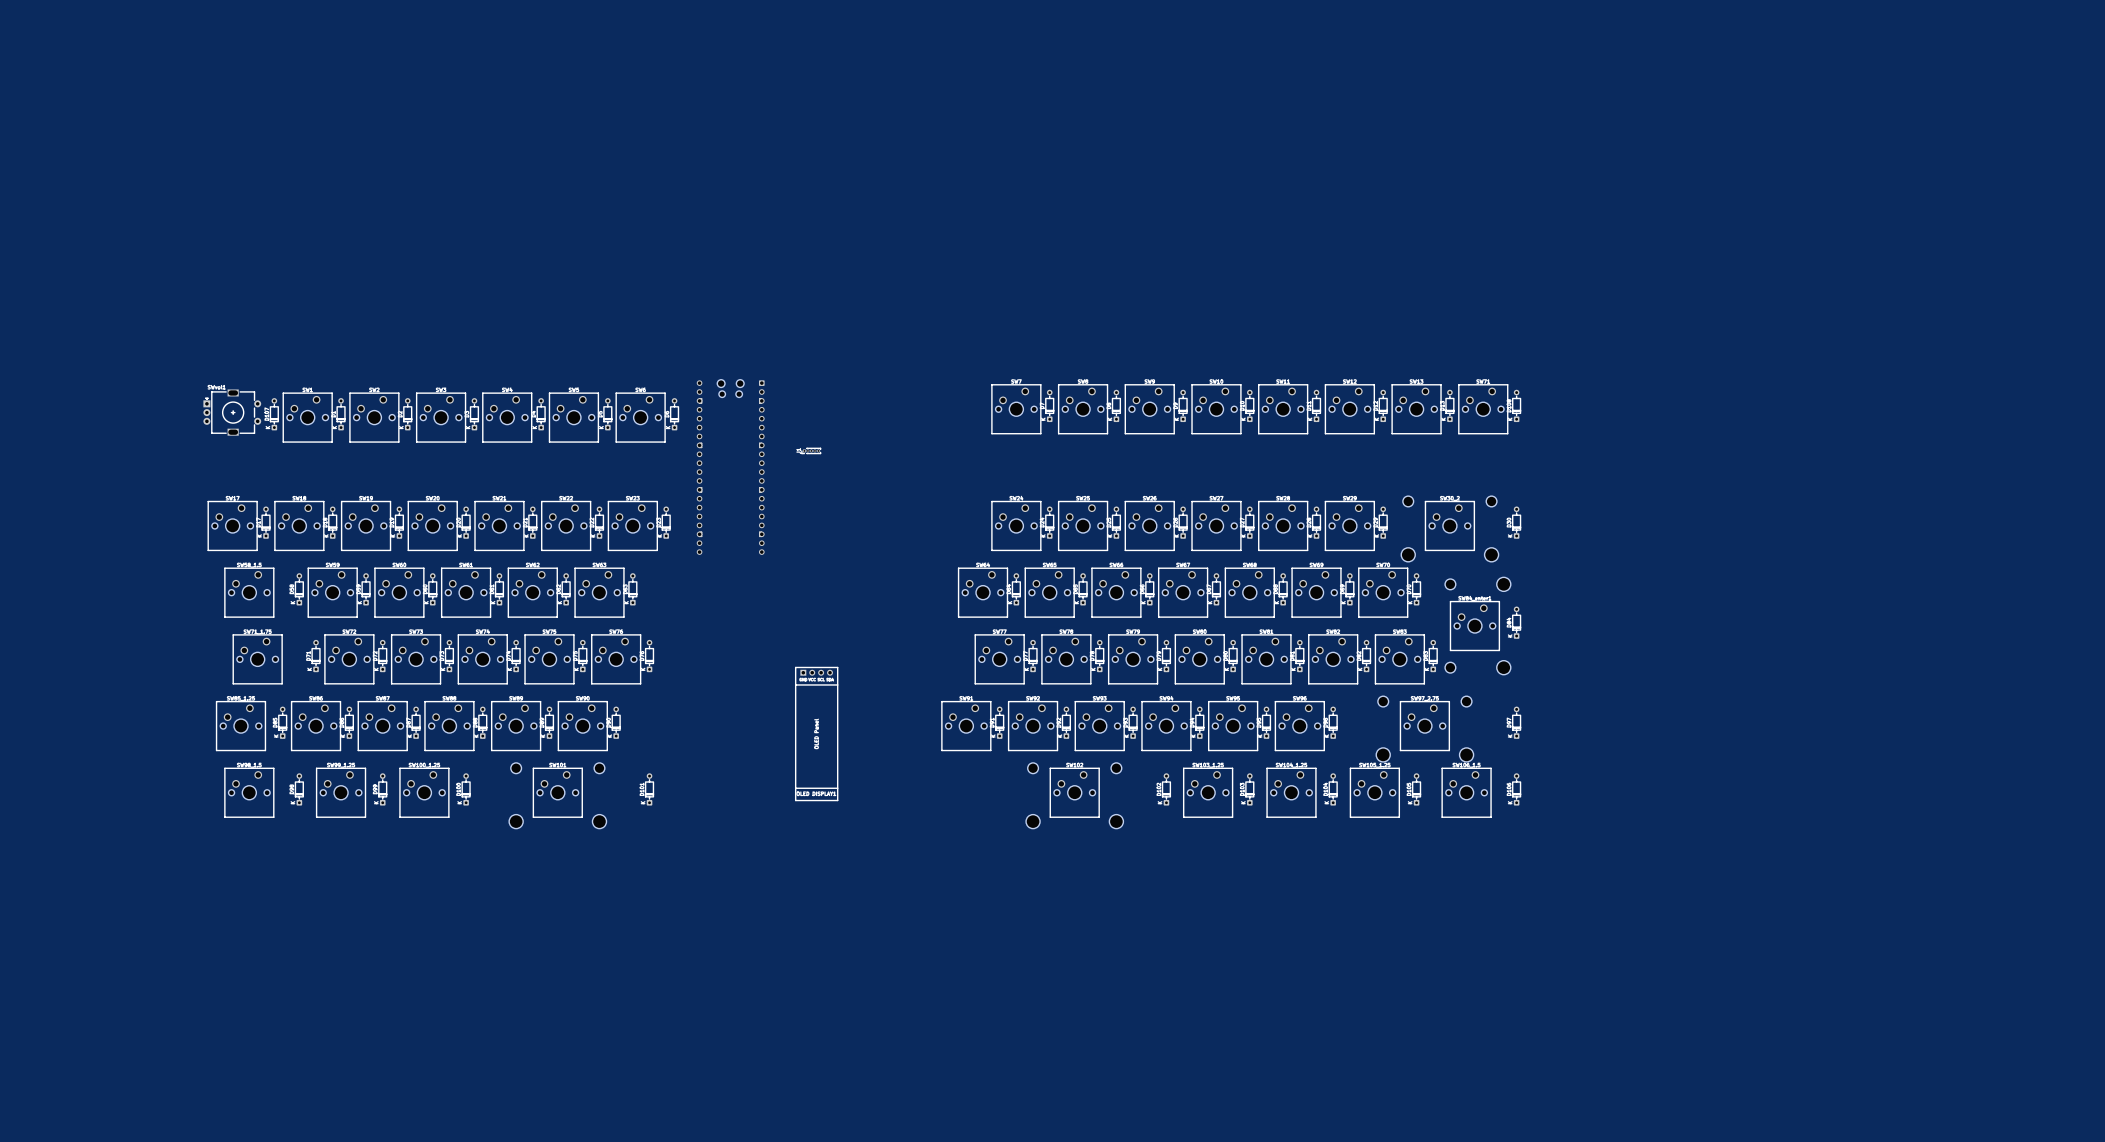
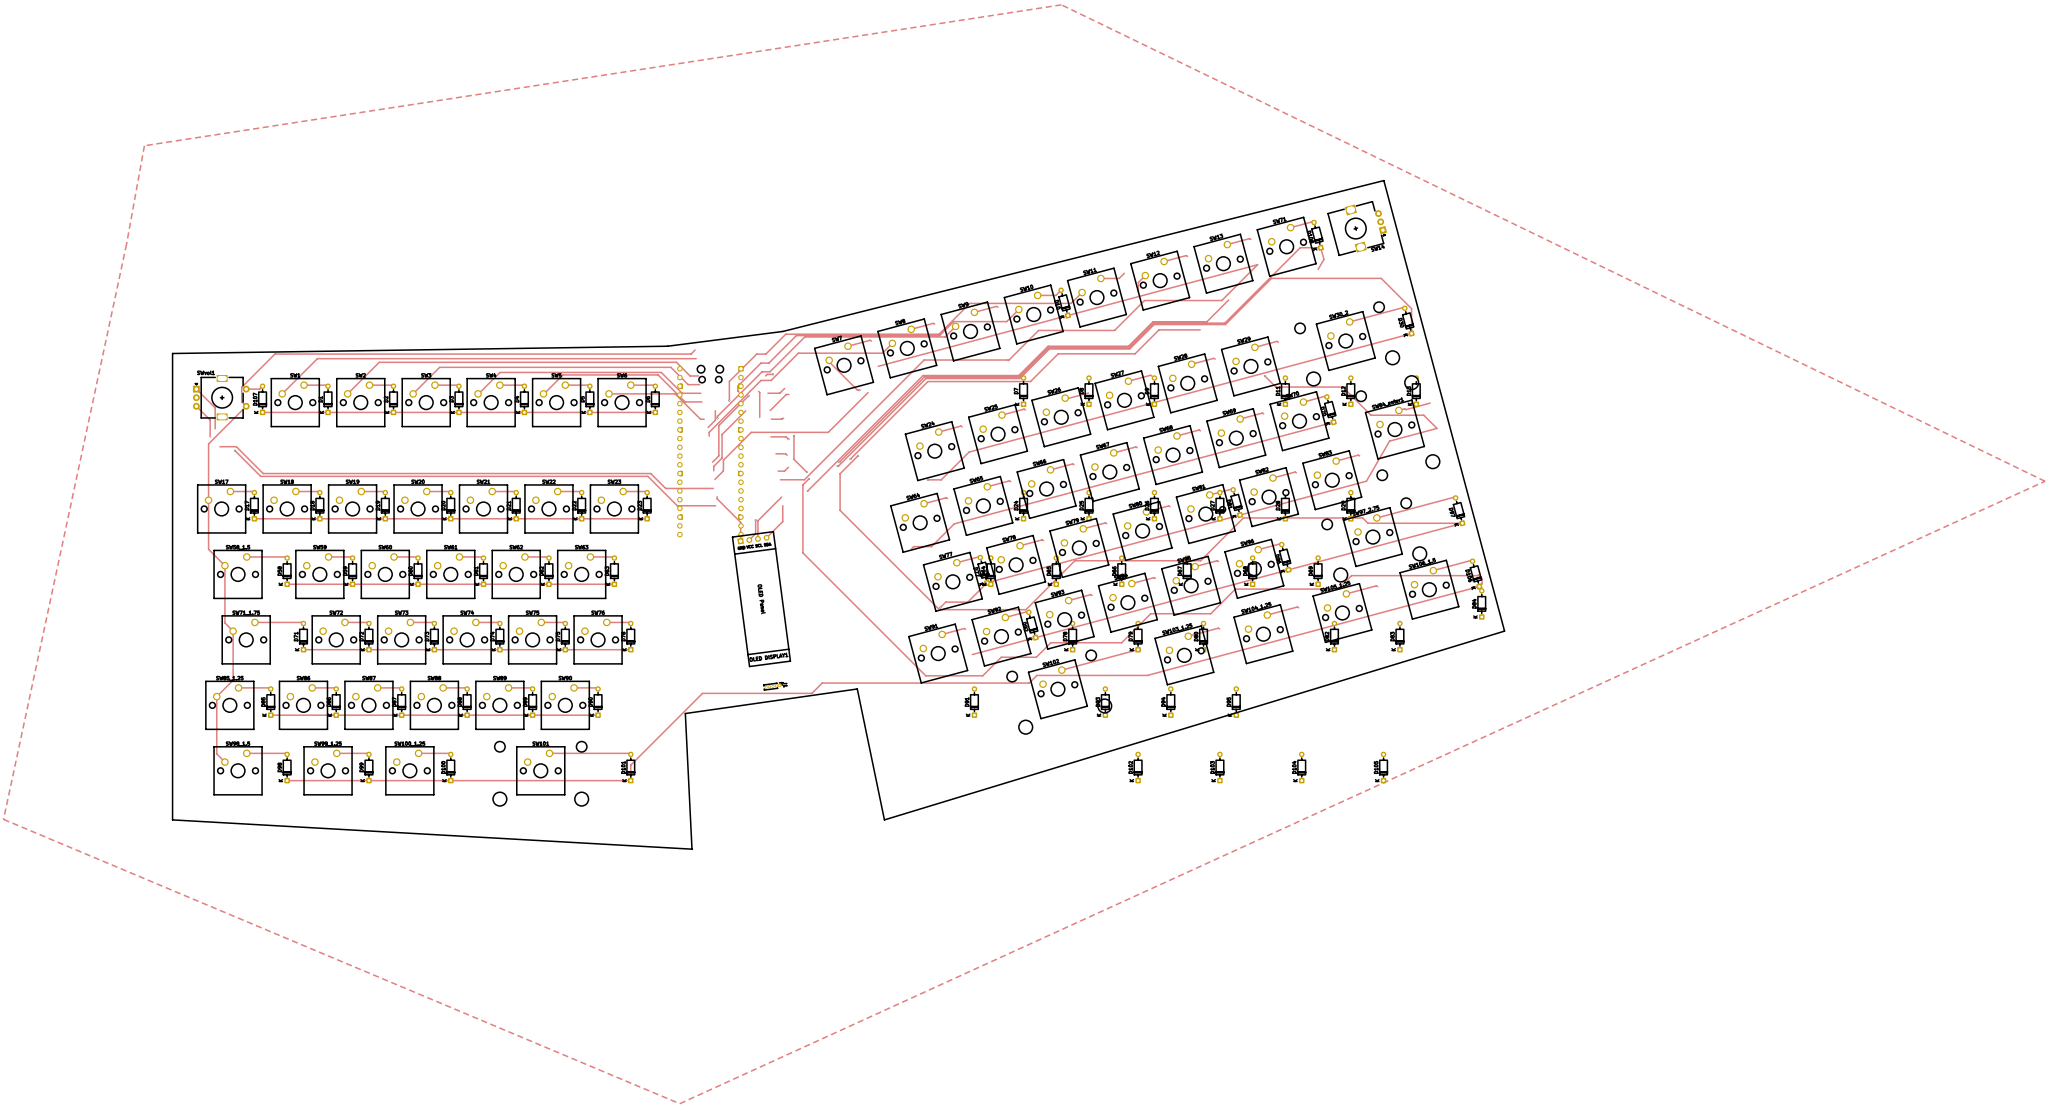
zone outline: none -> (1061, 4) (2045, 481) (679, 1103) (3, 819) (126, 244) (144, 145) (1061, 4)
board edge: none -> (1383, 180) (782, 331) (667, 346) (172, 353) (172, 819) (691, 849) (685, 713) (857, 688) (884, 819) (1504, 631) (1383, 180)
track: none -> (1314, 222) (1290, 227)
part: none -> (1357, 228)
track: none -> (1250, 239) (1227, 244)
track: none -> (1187, 256) (1164, 261)
track: none -> (1318, 269) (1323, 259) (1320, 247) (1300, 247) (1224, 323) (1153, 323) (1129, 347) (1048, 347) (1019, 376) (924, 376) (839, 462)
track: none -> (1124, 273) (1119, 278) (1100, 278)
track: none -> (1145, 275) (1138, 282) (1138, 292)
track: none -> (1061, 290) (1055, 295) (1037, 295)
track: none -> (1082, 292) (1071, 303) (969, 303) (939, 334) (785, 334) (765, 354) (756, 354) (729, 381) (729, 400)
track: none -> (1228, 299) (1206, 321) (1153, 321) (1128, 346) (1048, 346) (1018, 375) (923, 375) (807, 491)
track: none -> (997, 307) (974, 312)
track: none -> (1404, 308) (1349, 321)
track: none -> (1018, 309) (1006, 321) (953, 321) (939, 335) (796, 335) (768, 363) (760, 363) (737, 386) (738, 391)
track: none -> (934, 324) (911, 329)
track: none -> (955, 326) (945, 336) (804, 336) (769, 371) (762, 371) (717, 418)
track: none -> (1200, 329) (1159, 329) (1135, 353) (1058, 353) (1030, 381) (927, 381) (850, 459)
track: none -> (871, 341) (847, 346)
track: none -> (1278, 342) (1254, 347)
track: none -> (892, 343) (882, 353) (798, 353) (771, 380) (761, 380) (709, 432) (709, 436)
track: none -> (695, 350) (691, 354) (274, 354) (241, 387) (241, 401) (246, 406) (208, 443) (208, 549) (224, 565) (224, 622) (233, 631) (233, 680) (216, 696) (216, 753) (224, 762)
track: none -> (696, 358) (317, 358) (282, 393)
track: none -> (1215, 359) (1191, 364)
track: none -> (829, 360) (859, 390)
track: none -> (878, 366) (1257, 264) (1221, 300) (1144, 300) (1114, 330) (1038, 330) (1008, 360) (924, 360) (804, 479) (780, 479)
track: none -> (773, 374) (765, 375)
via: none -> (773, 374)
part footprint: [1245, 389, 1254, 423] -> [1058, 287, 1072, 319]
part footprint: [1512, 389, 1521, 423] -> [1311, 219, 1324, 251]
track: none -> (698, 375) (690, 375) (676, 362) (379, 362) (347, 393)
track: none -> (1151, 376) (1128, 381)
track: none -> (1264, 376) (1275, 387) (1342, 387) (1370, 415) (1423, 415) (1436, 428) (1389, 441) (1366, 481) (987, 582) (967, 602) (945, 602) (940, 607)
via: none -> (1264, 376)
track: none -> (304, 385) (328, 386)
track: none -> (369, 385) (393, 386)
track: none -> (434, 385) (458, 386)
track: none -> (499, 385) (524, 386)
track: none -> (565, 385) (589, 386)
track: none -> (630, 385) (655, 386)
track: none -> (699, 384) (688, 384) (670, 367) (439, 367) (413, 393)
track: none -> (262, 386) (259, 389) (246, 389)
track: none -> (196, 389) (215, 407) (215, 428)
track: none -> (784, 388) (779, 393) (767, 393)
via: none -> (859, 390)
track: none -> (758, 391) (759, 417)
track: none -> (868, 392) (828, 432) (751, 432) (723, 460) (723, 470) (714, 479)
track: none -> (1088, 392) (1065, 398)
track: none -> (544, 393) (563, 374) (658, 374) (685, 401) (701, 401)
track: none -> (609, 393) (675, 393) (700, 419) (704, 419)
track: none -> (700, 393) (682, 393) (661, 372) (500, 372) (478, 393)
track: none -> (788, 394) (786, 394) (770, 410)
part rotation: 0° (1016, 409) -> 15° counterclockwise (844, 365)
part position: (1016, 409) -> (844, 365)
part rotation: 0° (1083, 409) -> 15° counterclockwise (907, 348)
part position: (1083, 409) -> (907, 348)
part rotation: 0° (1149, 409) -> 15° counterclockwise (970, 331)
part position: (1149, 409) -> (970, 331)
part rotation: 0° (1216, 409) -> 15° counterclockwise (1033, 314)
part position: (1216, 409) -> (1033, 314)
part rotation: 0° (1283, 409) -> 15° counterclockwise (1096, 297)
part position: (1283, 409) -> (1096, 297)
part rotation: 0° (1349, 409) -> 15° counterclockwise (1160, 280)
part position: (1349, 409) -> (1160, 280)
part rotation: 0° (1416, 409) -> 15° counterclockwise (1223, 263)
part position: (1416, 409) -> (1223, 263)
part rotation: 0° (1483, 409) -> 15° counterclockwise (1286, 246)
part position: (1483, 409) -> (1286, 246)
track: none -> (748, 395) (718, 425) (718, 455) (712, 462)
via: none -> (748, 395)
track: none -> (1326, 396) (1303, 402)
via: none -> (729, 400)
track: none -> (1430, 403) (1398, 410)
track: none -> (196, 406) (210, 420) (210, 436)
track: none -> (715, 410) (715, 420) (708, 427)
track: none -> (745, 410) (722, 434) (722, 458) (713, 466) (713, 470)
track: none -> (1025, 409) (1001, 415)
track: none -> (262, 412) (655, 412)
track: none -> (1263, 413) (1240, 419)
via: none -> (717, 418)
track: none -> (783, 418) (771, 419)
track: none -> (1333, 422) (954, 523) (931, 546) (913, 546) (911, 548)
track: none -> (962, 426) (938, 432)
track: none -> (1200, 430) (1176, 435)
part rotation: 0° (811, 450) -> 172.5° clockwise (772, 686)
part position: (811, 450) -> (772, 686)
track: none -> (793, 435) (793, 459) (806, 472)
via: none -> (793, 435)
track: none -> (770, 436) (786, 436) (788, 439)
via: none -> (788, 439)
track: none -> (219, 446) (236, 446) (263, 473) (650, 473) (665, 488) (713, 488)
track: none -> (1137, 447) (1113, 452)
track: none -> (234, 450) (260, 476) (647, 476) (677, 505) (715, 505)
via: none -> (234, 450)
track: none -> (775, 453) (787, 455)
track: none -> (858, 455) (840, 473) (840, 510) (939, 609) (1025, 609) (1074, 560) (1200, 560) (1243, 517) (1362, 517) (1368, 523) (1462, 523) (972, 654)
via: none -> (858, 455)
track: none -> (1359, 455) (1336, 461)
via: none -> (850, 459)
via: none -> (839, 462)
track: none -> (1073, 464) (1050, 469)
track: none -> (837, 466) (925, 378) (1019, 378) (1049, 348) (1129, 348) (1154, 324) (1225, 324) (1271, 278) (1381, 278) (1411, 308) (1411, 333) (968, 452) (941, 479) (927, 479)
via: none -> (837, 466)
track: none -> (788, 467) (784, 471) (778, 471)
via: none -> (806, 472)
track: none -> (1296, 472) (1272, 478)
track: none -> (808, 478) (802, 484) (802, 552) (925, 675) (982, 675) (1001, 657) (1036, 657) (1050, 642) (1121, 642) (1150, 613) (1210, 613) (1235, 589) (1338, 589) (1351, 575) (1478, 575) (1482, 578) (1482, 583) (1479, 586) (1147, 675) (1036, 675) (1029, 683) (822, 683) (811, 693) (702, 693) (630, 765) (630, 780) (287, 780)
via: none -> (808, 478)
via: none -> (927, 479)
track: none -> (1010, 481) (987, 486)
track: none -> (1233, 489) (1209, 494)
part footprint: [1512, 506, 1521, 539] -> [1402, 305, 1415, 337]
track: none -> (230, 491) (254, 492)
track: none -> (295, 491) (319, 492)
track: none -> (361, 491) (385, 492)
track: none -> (426, 491) (450, 492)
track: none -> (492, 491) (516, 492)
track: none -> (557, 491) (581, 492)
track: none -> (623, 491) (647, 492)
track: none -> (717, 496) (740, 522) (740, 541)
track: none -> (781, 497) (757, 520) (757, 538)
track: none -> (1455, 497) (1376, 517)
track: none -> (947, 498) (924, 503)
track: none -> (782, 505) (782, 521) (766, 537)
track: none -> (1169, 506) (1146, 511)
part rotation: 0° (1016, 525) -> 15° counterclockwise (934, 451)
part position: (1016, 525) -> (934, 451)
part rotation: 0° (1083, 525) -> 15° counterclockwise (998, 434)
part position: (1083, 525) -> (998, 434)
part rotation: 0° (1149, 525) -> 15° counterclockwise (1061, 417)
part position: (1149, 525) -> (1061, 417)
part rotation: 0° (1216, 525) -> 15° counterclockwise (1124, 400)
part position: (1216, 525) -> (1124, 400)
part rotation: 0° (1283, 525) -> 15° counterclockwise (1187, 383)
part position: (1283, 525) -> (1187, 383)
part rotation: 0° (1349, 525) -> 15° counterclockwise (1250, 366)
part position: (1349, 525) -> (1250, 366)
part rotation: 0° (1449, 528) -> 15° counterclockwise (1347, 343)
part position: (1449, 528) -> (1347, 343)
track: none -> (254, 518) (647, 518)
track: none -> (755, 520) (755, 533) (749, 540)
via: none -> (755, 520)
track: none -> (1106, 523) (1083, 528)
track: none -> (1043, 540) (1020, 545)
track: none -> (1281, 544) (1258, 549)
part footprint: [1412, 573, 1421, 606] -> [1324, 394, 1337, 426]
track: none -> (246, 556) (287, 558)
track: none -> (328, 556) (352, 558)
track: none -> (394, 556) (418, 558)
track: none -> (459, 556) (483, 558)
track: none -> (524, 556) (548, 558)
track: none -> (590, 556) (614, 558)
track: none -> (980, 557) (956, 562)
track: none -> (1218, 561) (1195, 566)
track: none -> (1472, 561) (1433, 570)
part rotation: 0° (983, 592) -> 15° counterclockwise (920, 522)
part position: (983, 592) -> (920, 522)
part rotation: 0° (1049, 592) -> 15° counterclockwise (983, 505)
part position: (1049, 592) -> (983, 505)
part rotation: 0° (1116, 592) -> 15° counterclockwise (1046, 488)
part position: (1116, 592) -> (1046, 488)
part rotation: 0° (1183, 592) -> 15° counterclockwise (1109, 472)
part position: (1183, 592) -> (1109, 472)
part rotation: 0° (1249, 592) -> 15° counterclockwise (1173, 455)
part position: (1249, 592) -> (1173, 455)
part rotation: 0° (1316, 592) -> 15° counterclockwise (1236, 438)
part position: (1316, 592) -> (1236, 438)
part rotation: 0° (1383, 592) -> 15° counterclockwise (1299, 421)
part position: (1383, 592) -> (1299, 421)
track: none -> (1155, 578) (1131, 583)
track: none -> (287, 584) (614, 584)
track: none -> (1377, 586) (1346, 593)
track: none -> (1092, 595) (1068, 600)
via: none -> (940, 607)
track: none -> (1298, 607) (1267, 615)
part rotation: 0° (1477, 626) -> 15° counterclockwise (1397, 428)
part position: (1477, 626) -> (1397, 428)
track: none -> (1028, 612) (1005, 617)
part footprint: [1028, 639, 1038, 673] -> [977, 554, 991, 587]
part footprint: [1295, 639, 1304, 673] -> [1230, 487, 1244, 519]
track: none -> (254, 622) (303, 623)
track: none -> (344, 622) (368, 623)
track: none -> (410, 622) (434, 623)
track: none -> (475, 622) (499, 623)
track: none -> (541, 622) (565, 623)
track: none -> (606, 622) (630, 623)
track: none -> (965, 629) (942, 634)
track: none -> (1219, 628) (1188, 636)
part rotation: 0° (999, 659) -> 15° counterclockwise (952, 581)
part position: (999, 659) -> (952, 581)
part rotation: 0° (1066, 659) -> 15° counterclockwise (1016, 564)
part position: (1066, 659) -> (1016, 564)
part rotation: 0° (1133, 659) -> 15° counterclockwise (1079, 547)
part position: (1133, 659) -> (1079, 547)
part rotation: 0° (1199, 659) -> 15° counterclockwise (1142, 531)
part position: (1199, 659) -> (1142, 531)
part rotation: 0° (1266, 659) -> 15° counterclockwise (1205, 514)
part position: (1266, 659) -> (1205, 514)
part rotation: 0° (1333, 659) -> 15° counterclockwise (1269, 497)
part position: (1333, 659) -> (1269, 497)
part rotation: 0° (1399, 659) -> 15° counterclockwise (1332, 480)
part position: (1399, 659) -> (1332, 480)
track: none -> (303, 649) (630, 649)
track: none -> (1140, 650) (1061, 670)
part footprint: [1062, 706, 1071, 739] -> [1026, 609, 1039, 641]
part footprint: [1329, 706, 1338, 739] -> [1279, 541, 1292, 574]
part footprint: [1512, 706, 1521, 739] -> [1452, 495, 1466, 527]
track: none -> (238, 687) (270, 688)
track: none -> (312, 687) (336, 688)
track: none -> (377, 687) (401, 688)
track: none -> (443, 687) (467, 688)
track: none -> (508, 687) (532, 688)
track: none -> (574, 687) (598, 688)
part rotation: 0° (966, 726) -> 15° counterclockwise (938, 653)
part position: (966, 726) -> (938, 653)
part rotation: 0° (1033, 726) -> 15° counterclockwise (1001, 636)
part position: (1033, 726) -> (1001, 636)
part rotation: 0° (1099, 726) -> 15° counterclockwise (1064, 619)
part position: (1099, 726) -> (1064, 619)
part rotation: 0° (1166, 726) -> 15° counterclockwise (1127, 602)
part position: (1166, 726) -> (1127, 602)
part rotation: 0° (1233, 726) -> 15° counterclockwise (1191, 585)
part position: (1233, 726) -> (1191, 585)
part rotation: 0° (1299, 726) -> 15° counterclockwise (1254, 568)
part position: (1299, 726) -> (1254, 568)
part rotation: 0° (1424, 729) -> 15° counterclockwise (1374, 539)
part position: (1424, 729) -> (1374, 539)
part rotation: 0° (816, 734) -> 7.5° counterclockwise (761, 599)
part position: (816, 734) -> (761, 599)
track: none -> (270, 715) (598, 715)
part footprint: [1512, 773, 1521, 806] -> [1469, 558, 1483, 590]
track: none -> (246, 753) (287, 754)
track: none -> (336, 753) (368, 754)
track: none -> (418, 753) (450, 754)
track: none -> (549, 753) (630, 754)
part rotation: 0° (1208, 792) -> 15° counterclockwise (1184, 655)
part position: (1208, 792) -> (1184, 655)
part rotation: 0° (1291, 792) -> 15° counterclockwise (1263, 634)
part position: (1291, 792) -> (1263, 634)
part rotation: 0° (1374, 792) -> 15° counterclockwise (1342, 613)
part position: (1374, 792) -> (1342, 613)
part rotation: 0° (1466, 792) -> 15° counterclockwise (1429, 589)
part position: (1466, 792) -> (1429, 589)
part rotation: 0° (1074, 795) -> 15° counterclockwise (1059, 692)
part position: (1074, 795) -> (1059, 692)

